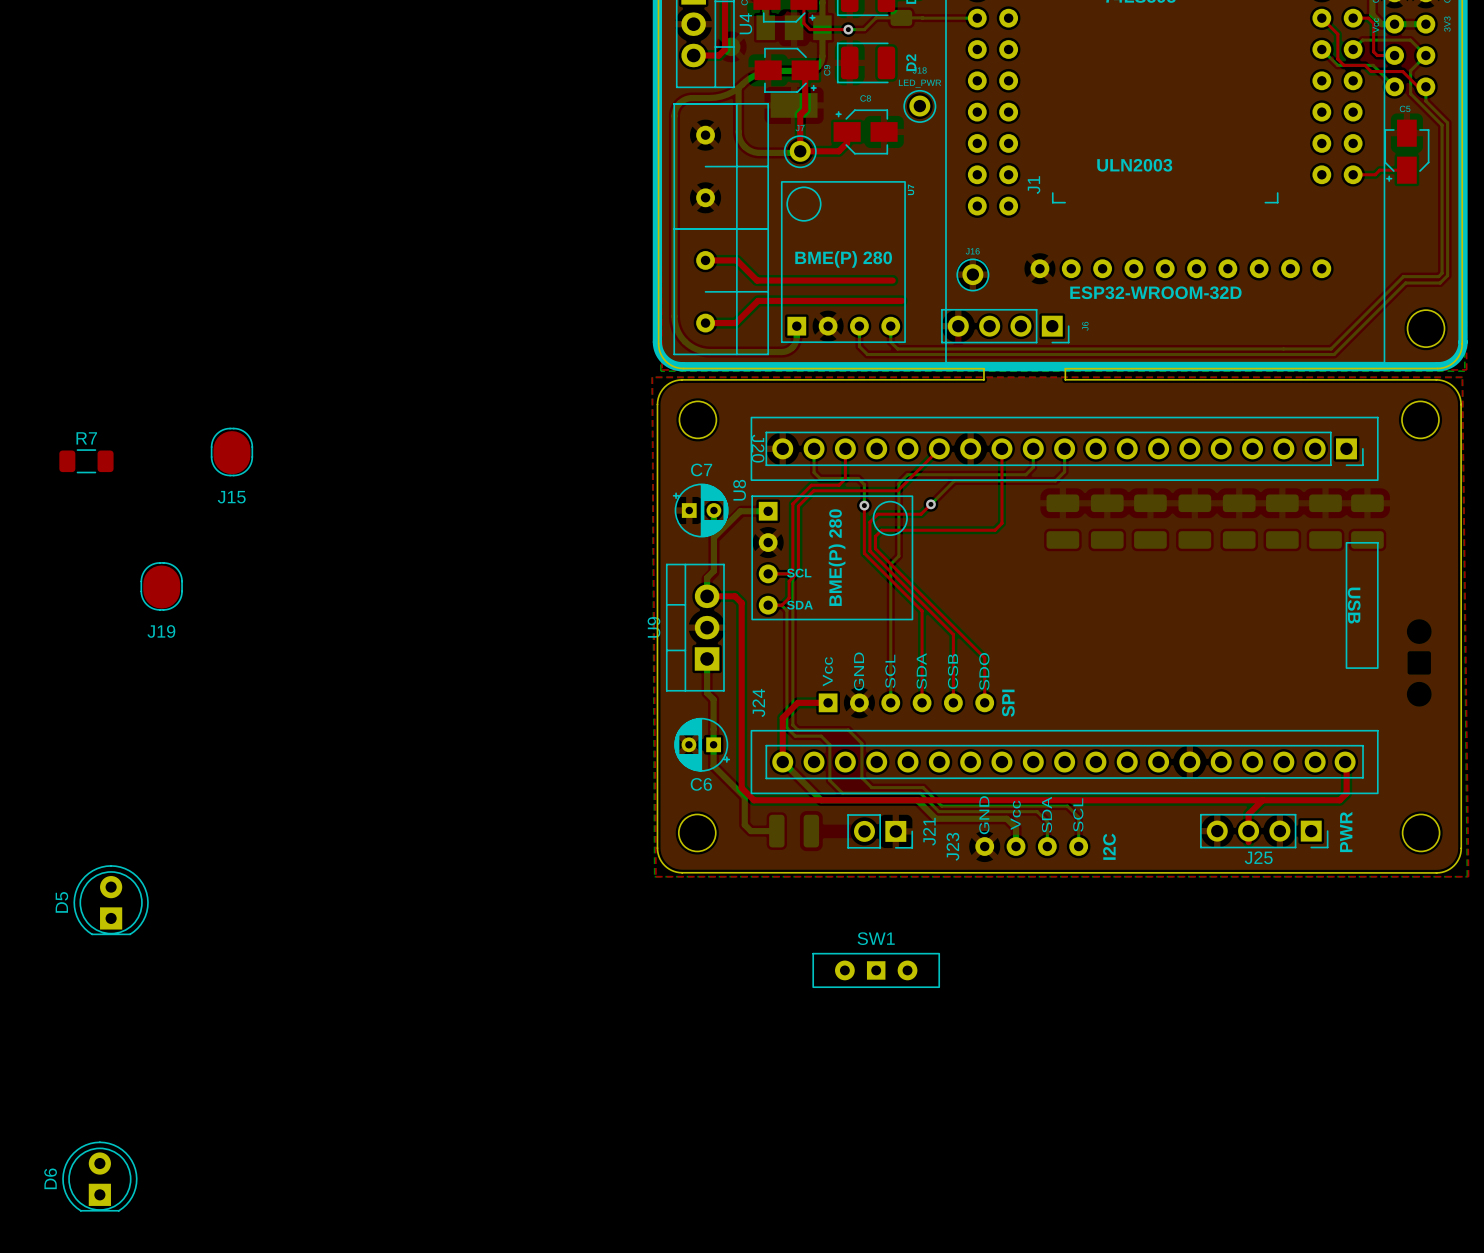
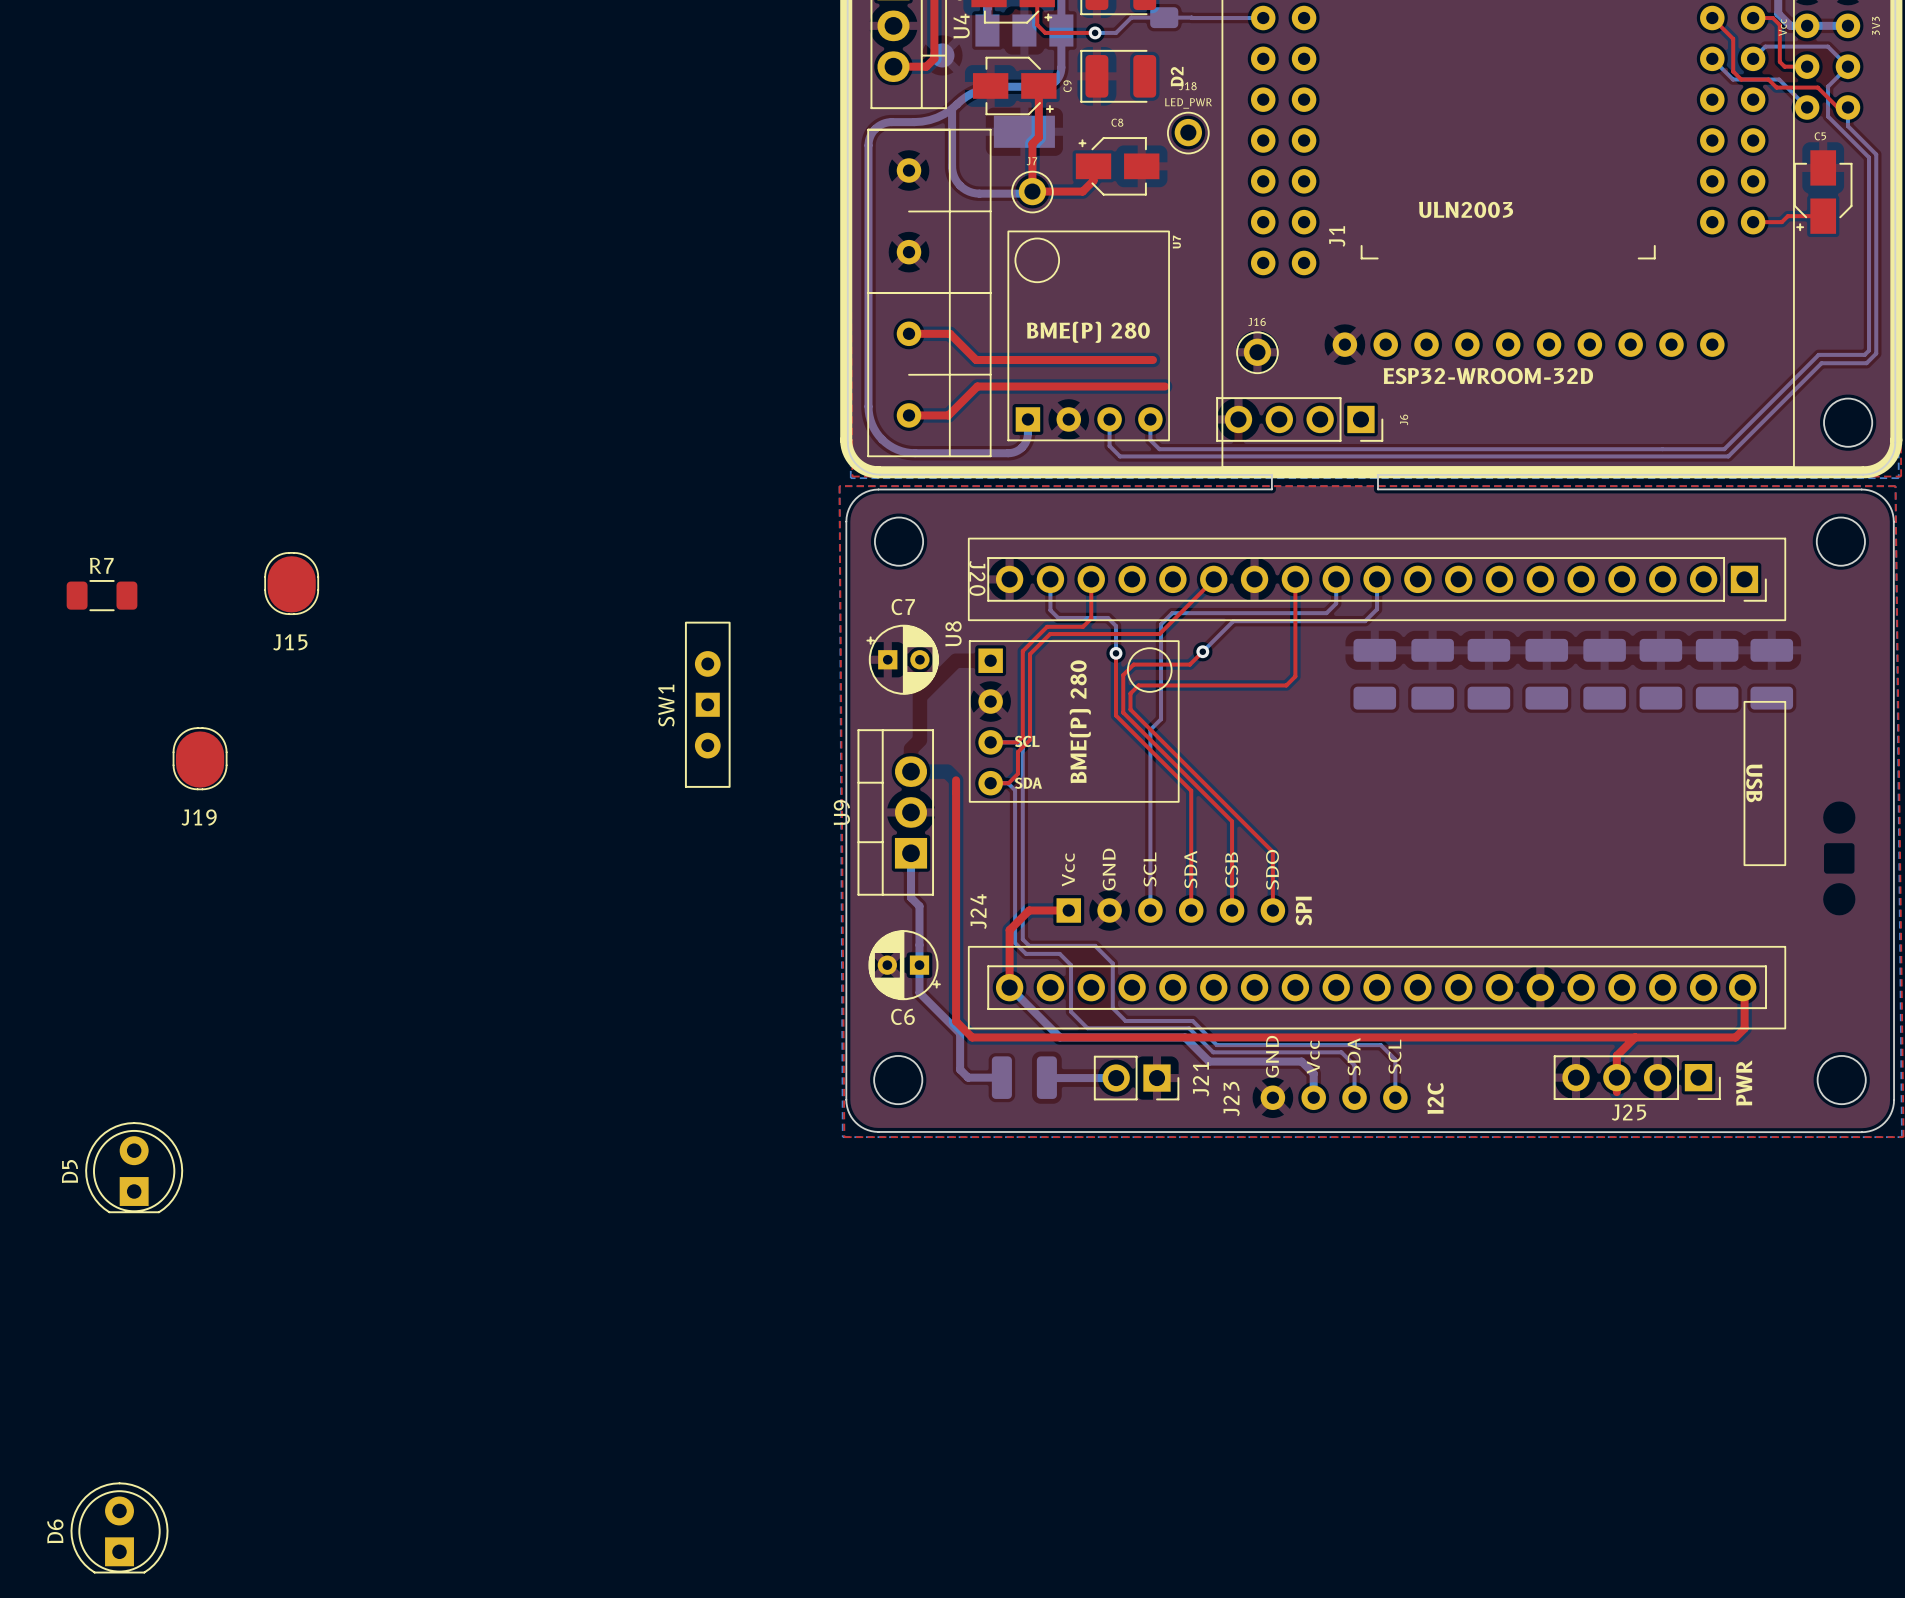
bottom track: (713, 510) (713, 570) (707, 577) (707, 596) -> none
bottom track: (768, 511) (740, 511) (713, 537) -> none
top track: (707, 596) (735, 596) (741, 602) -> none
bottom track: none -> (1047, 1078) (1116, 1078)
SW1 name position: SW1 (876, 938) -> SW1 (666, 705)
SW1 rotation: 0° (876, 970) -> 90° clockwise (707, 704)
SW1 position: (876, 970) -> (707, 704)

